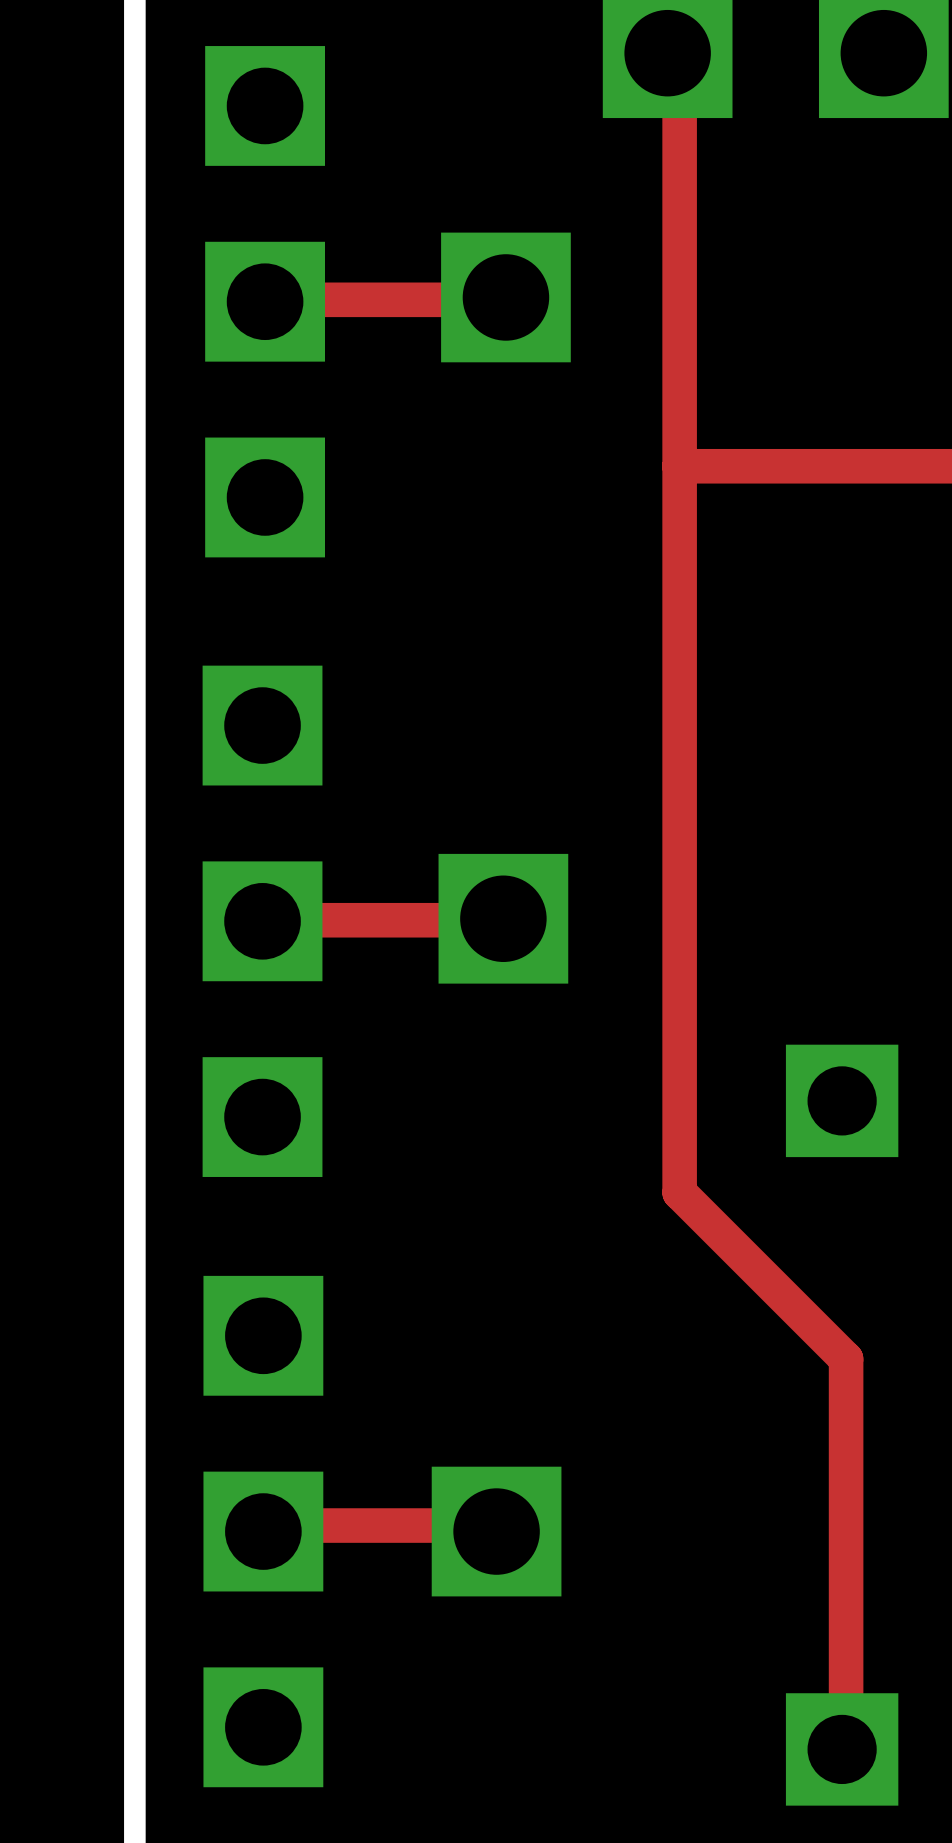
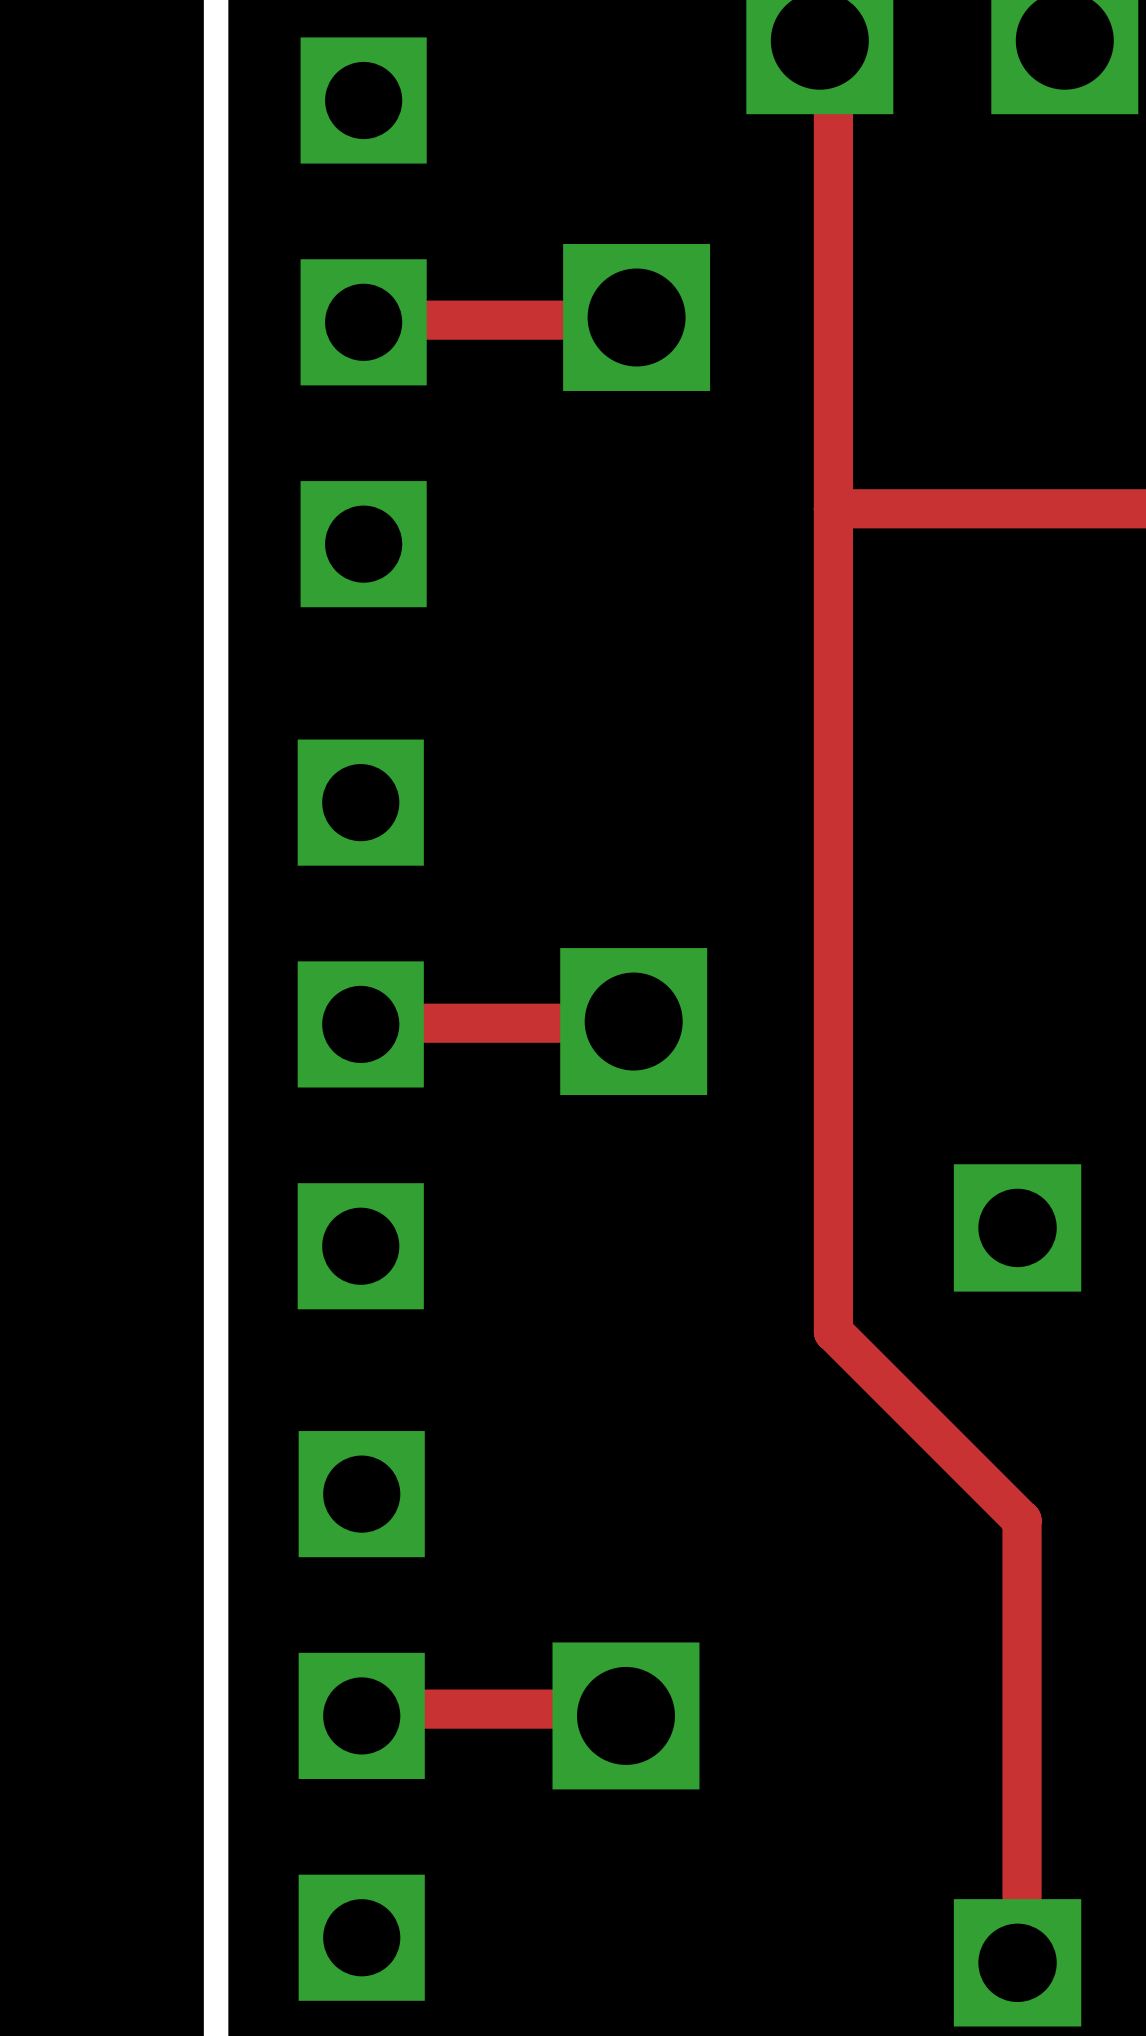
part footprint: [205, 46, 326, 558] -> [300, 37, 427, 608]
part footprint: [202, 665, 323, 1177] -> [297, 739, 424, 1310]
part footprint: [203, 1275, 324, 1788] -> [298, 1431, 425, 2001]

